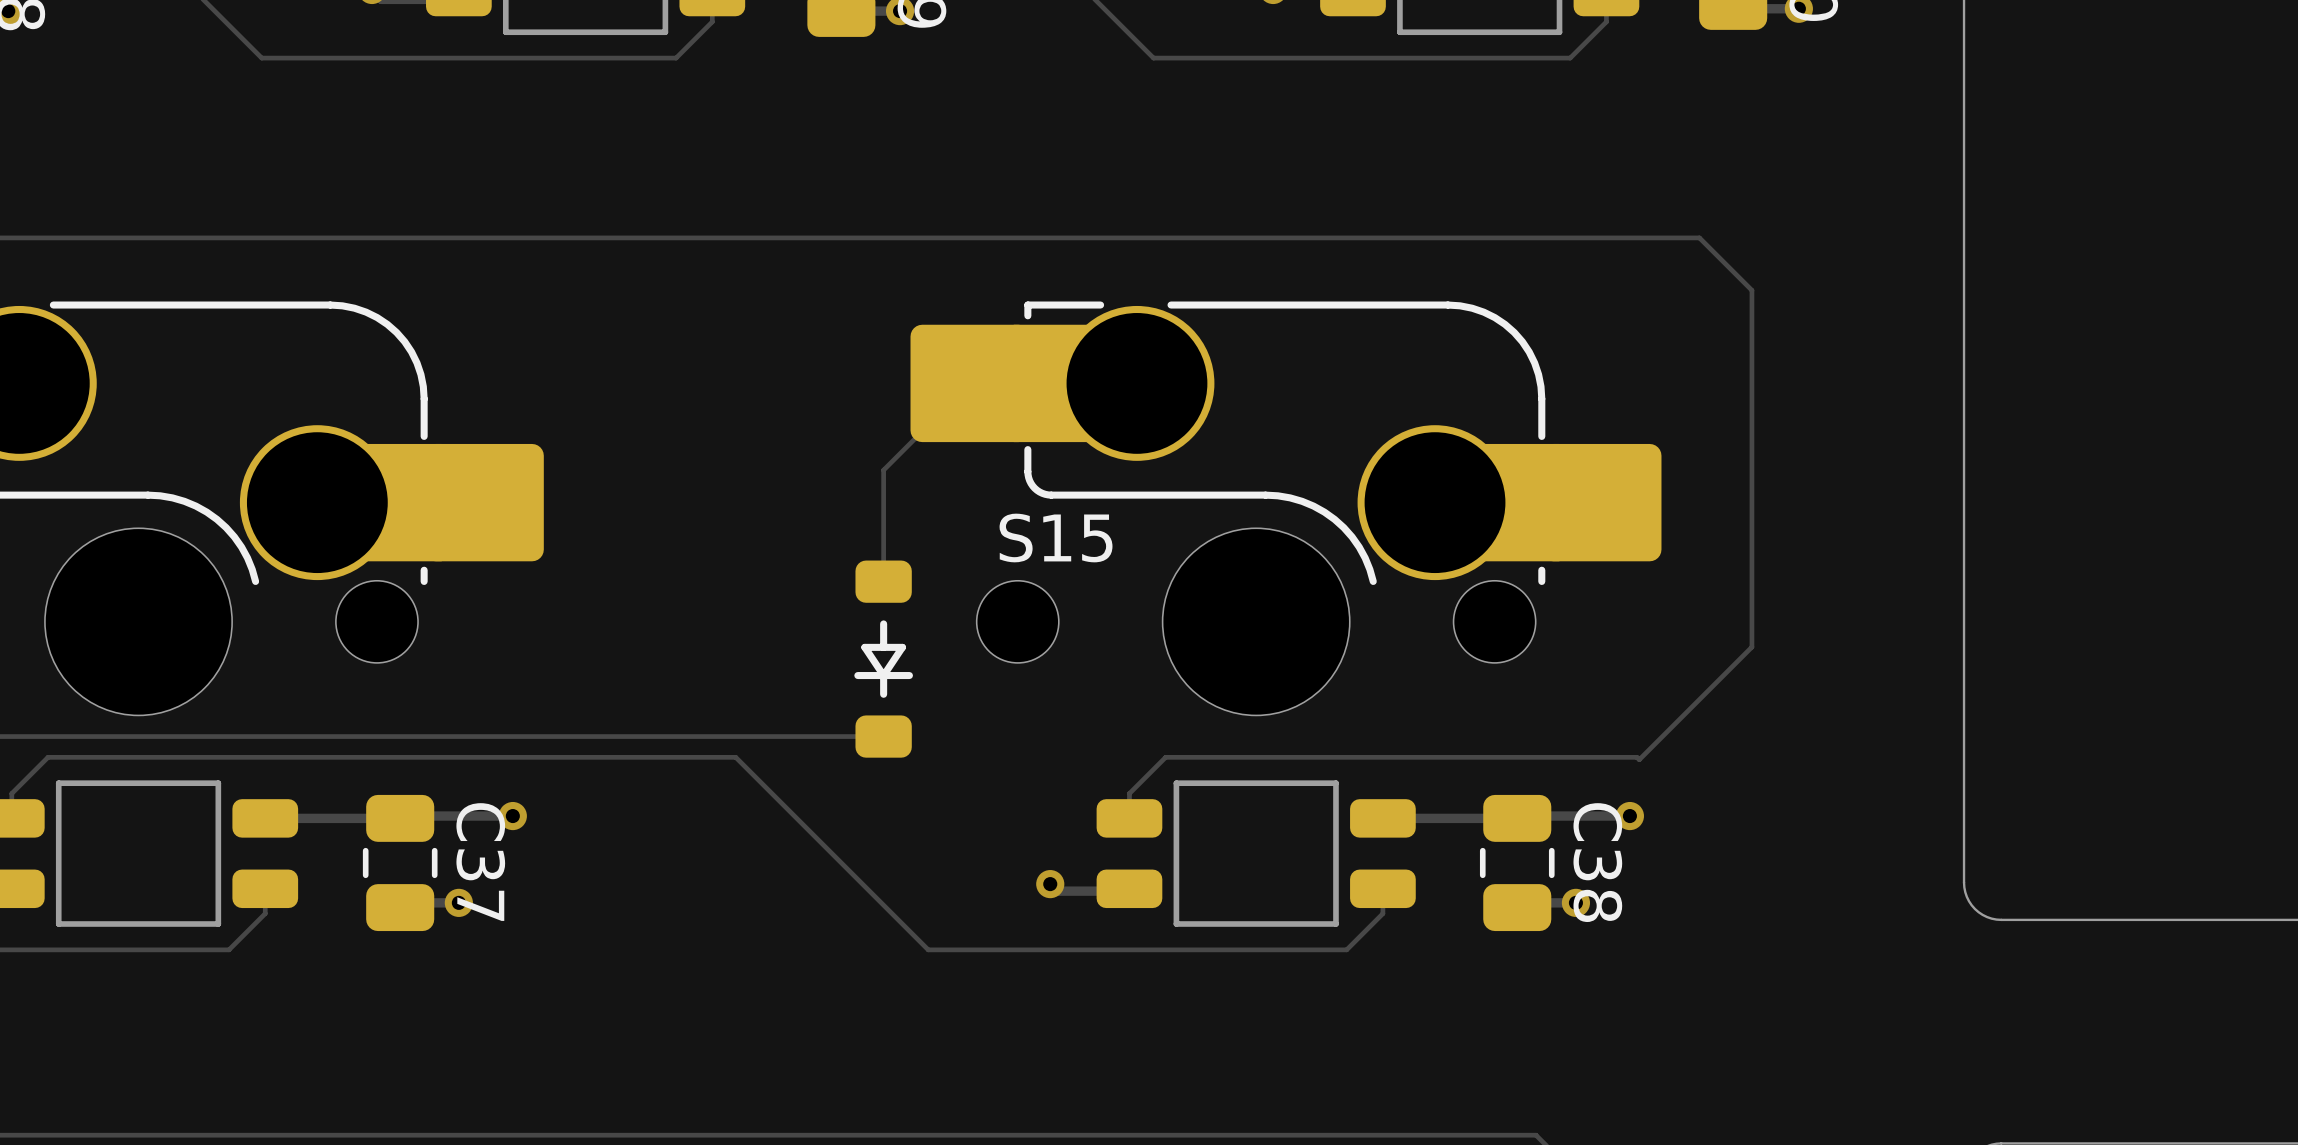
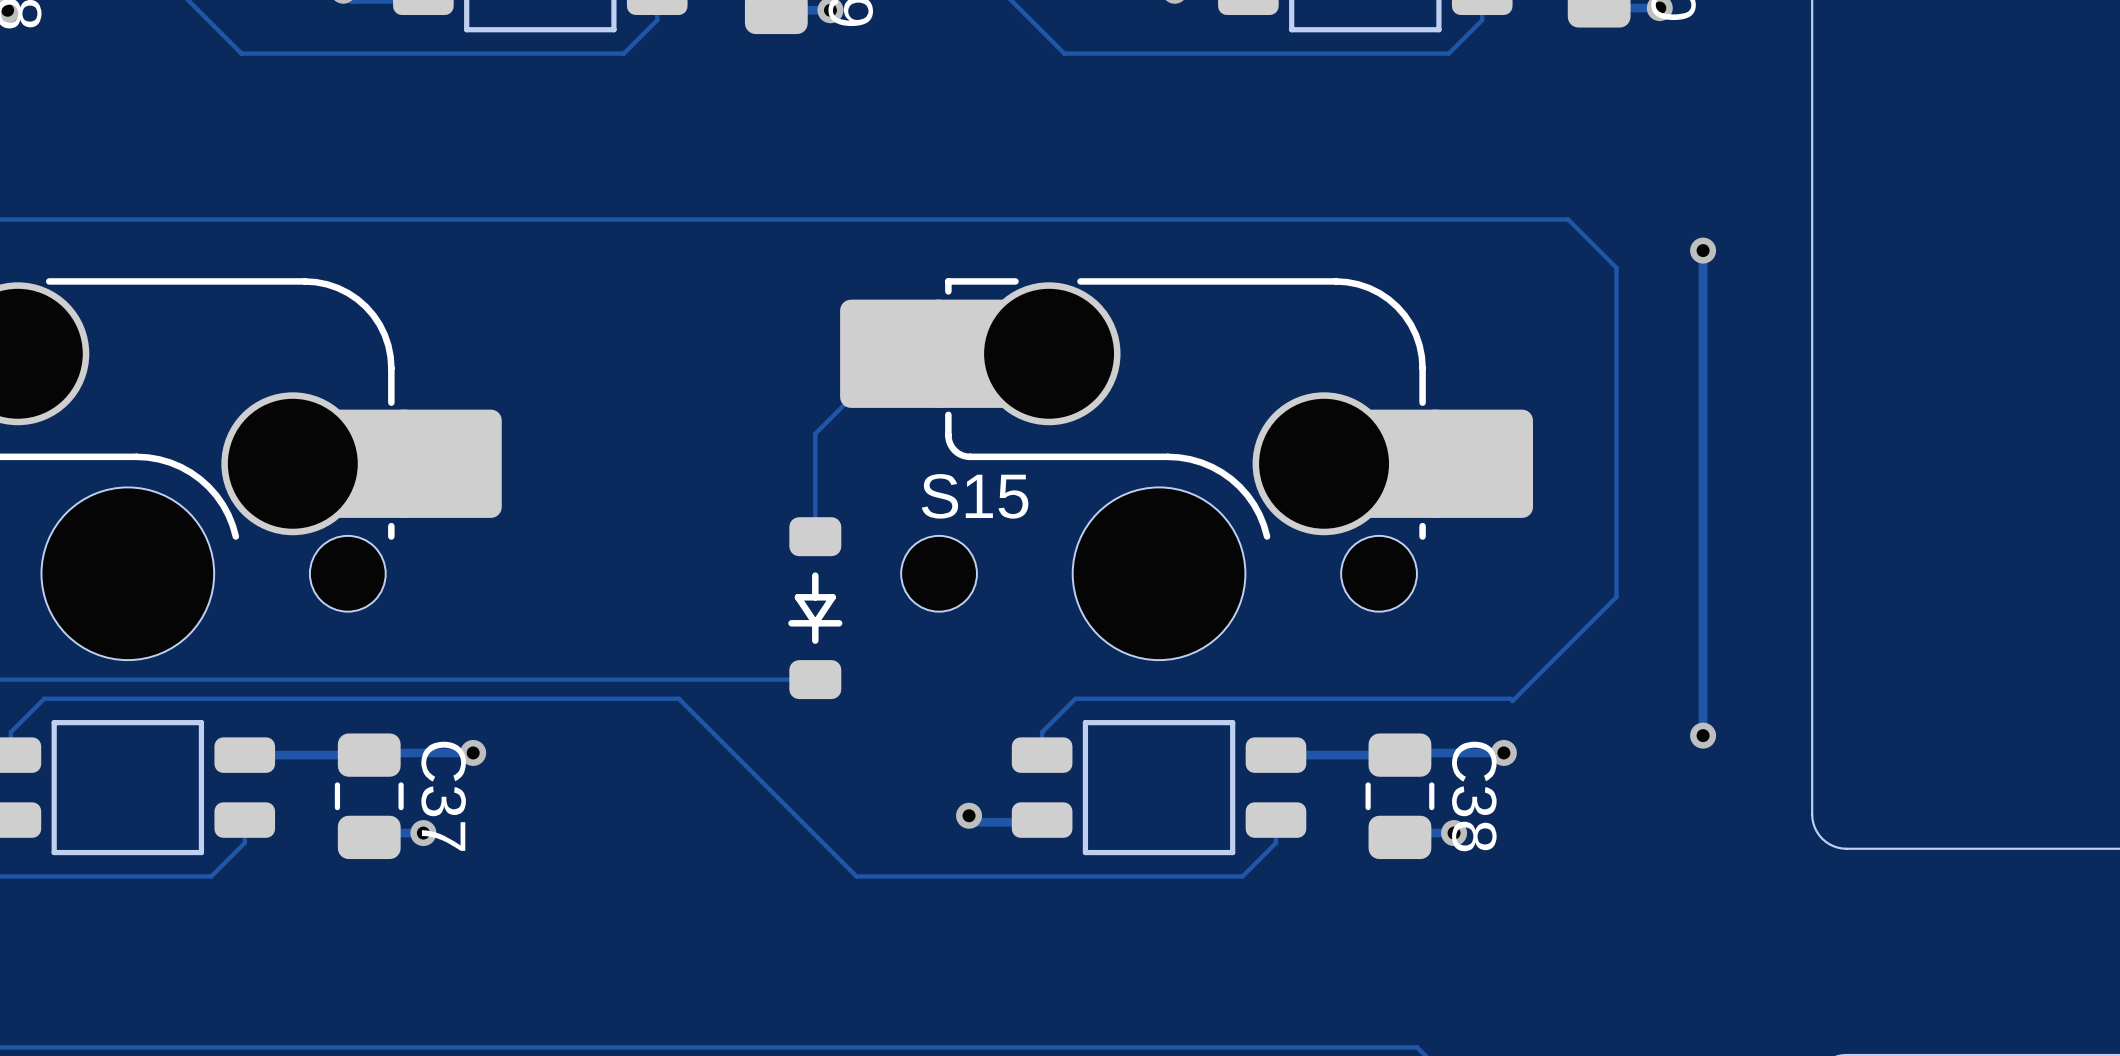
track: none -> (1703, 250) (1703, 735)
via: none -> (1703, 250)
via: none -> (1703, 735)

